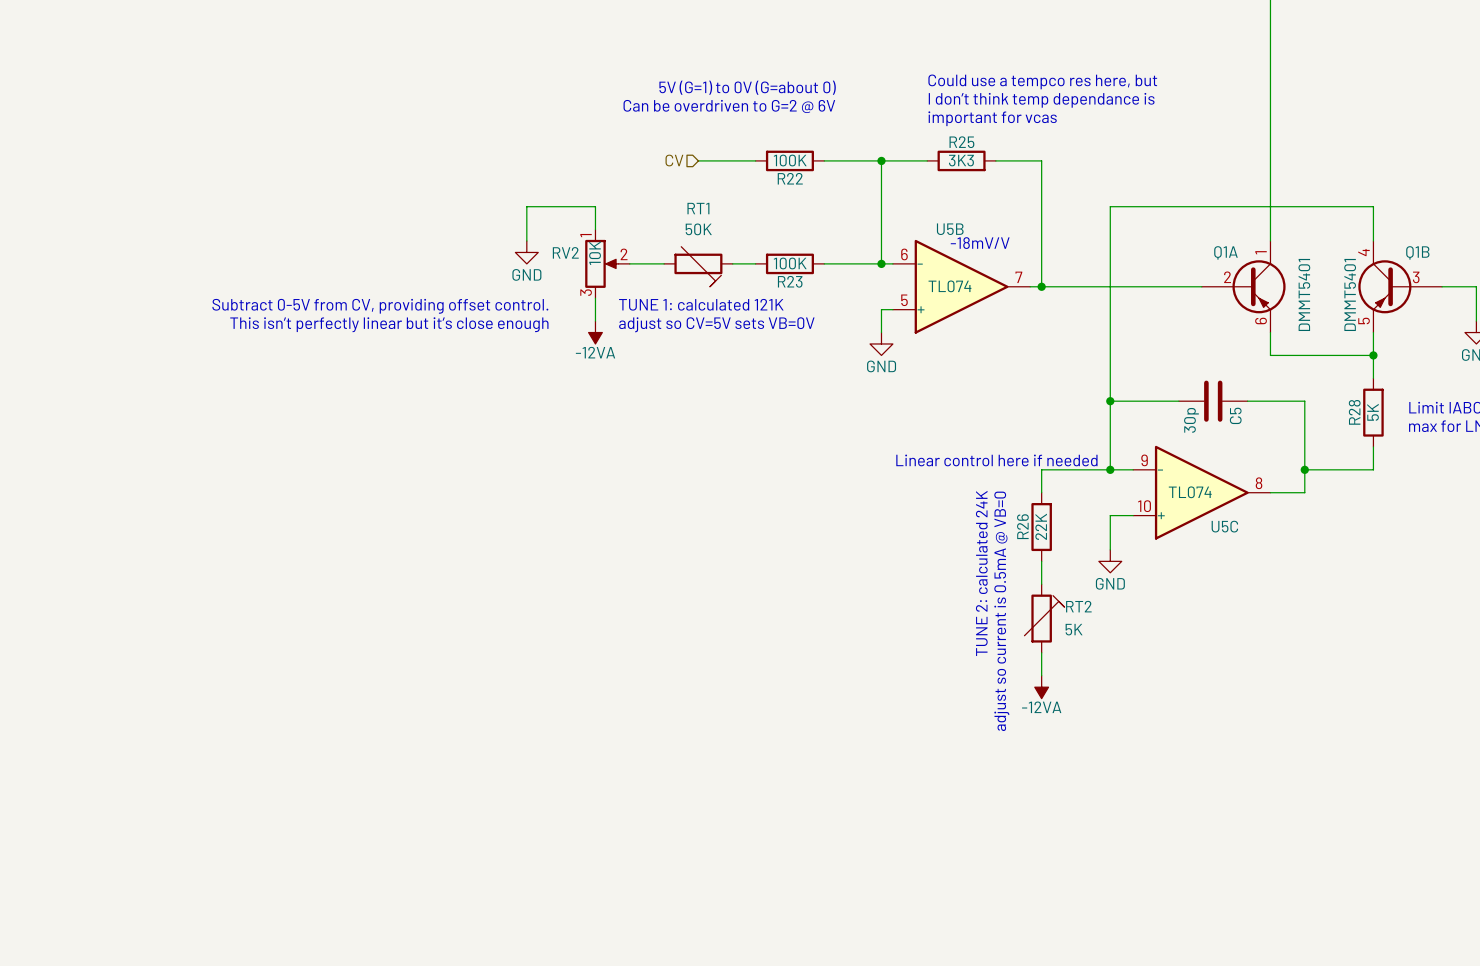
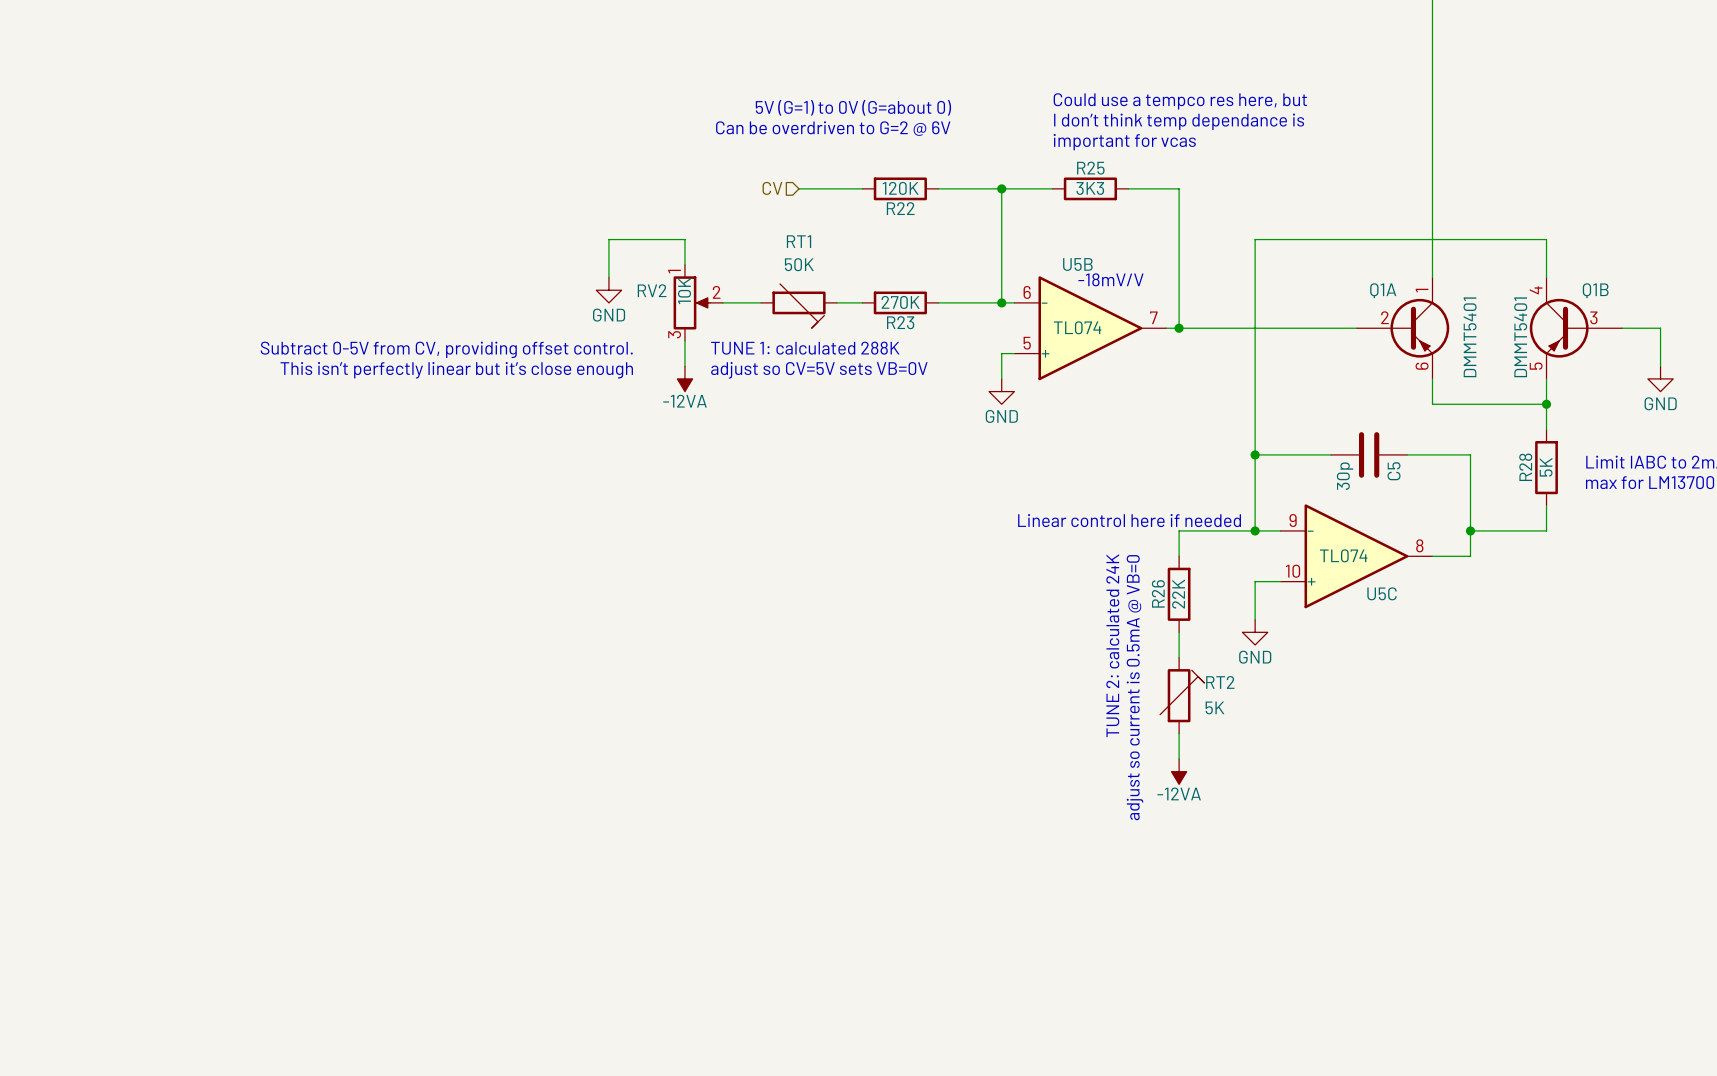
R22 value: 100K (790, 160) -> 120K (900, 188)
R23 value: 100K (790, 263) -> 270K (900, 302)
text: TUNE 1: calculated 121K (701, 304) -> TUNE 1: calculated 288K (805, 348)

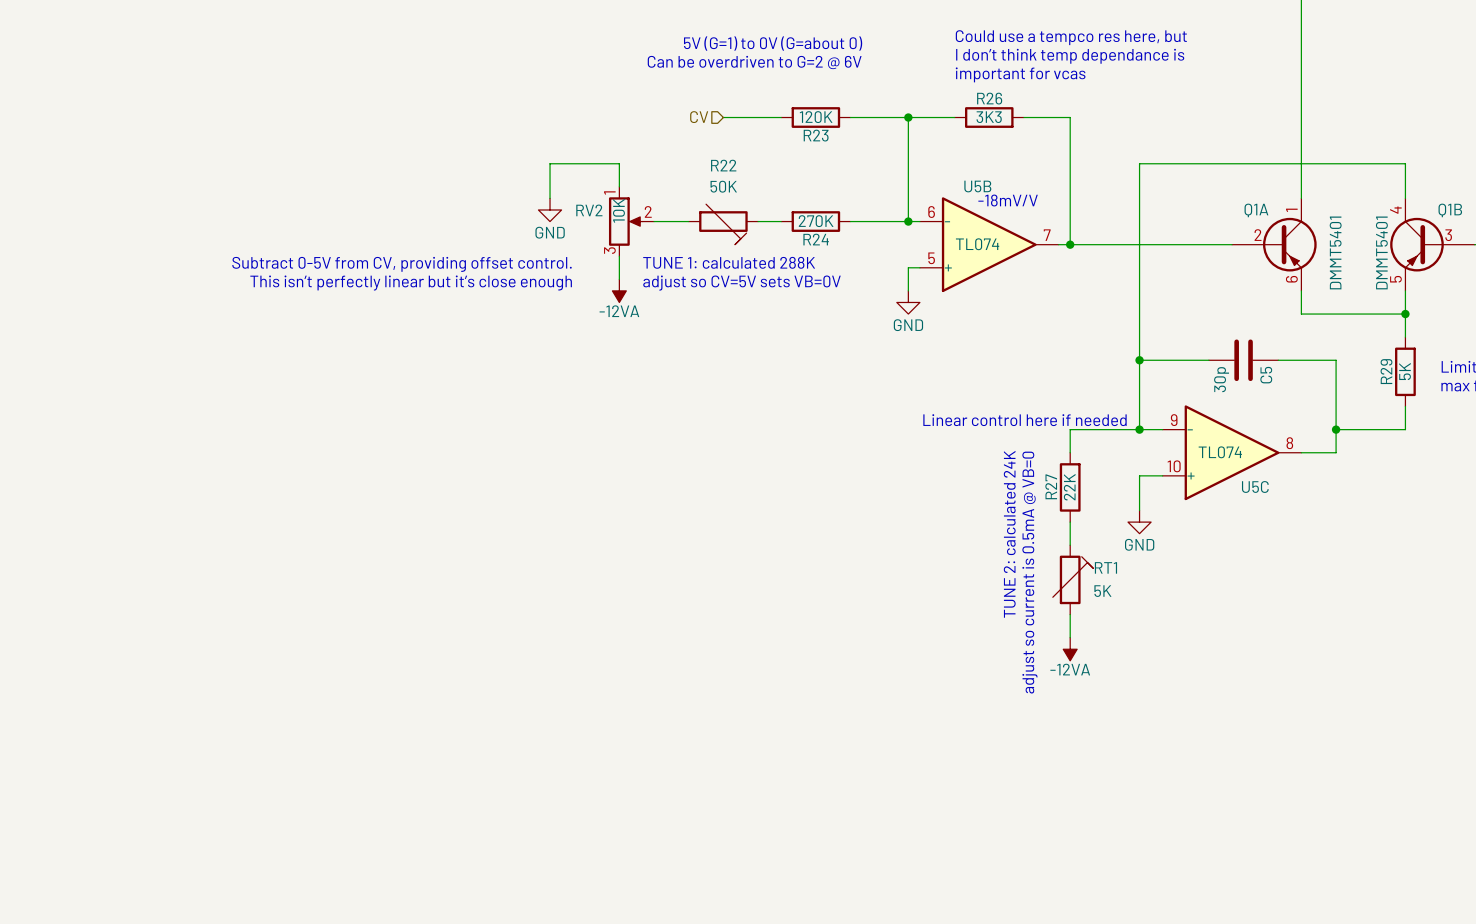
R25 name: R25 (1090, 168) -> R26 (989, 98)
R22 name: R22 (900, 208) -> R23 (816, 135)
RT1 name: RT1 (799, 241) -> R22 (723, 165)
R23 name: R23 (900, 322) -> R24 (816, 239)
R28 name: R28 (1525, 467) -> R29 (1386, 371)
R26 name: R26 (1158, 593) -> R27 (1051, 486)
RT2 name: RT2 (1220, 682) -> RT1 (1105, 567)

